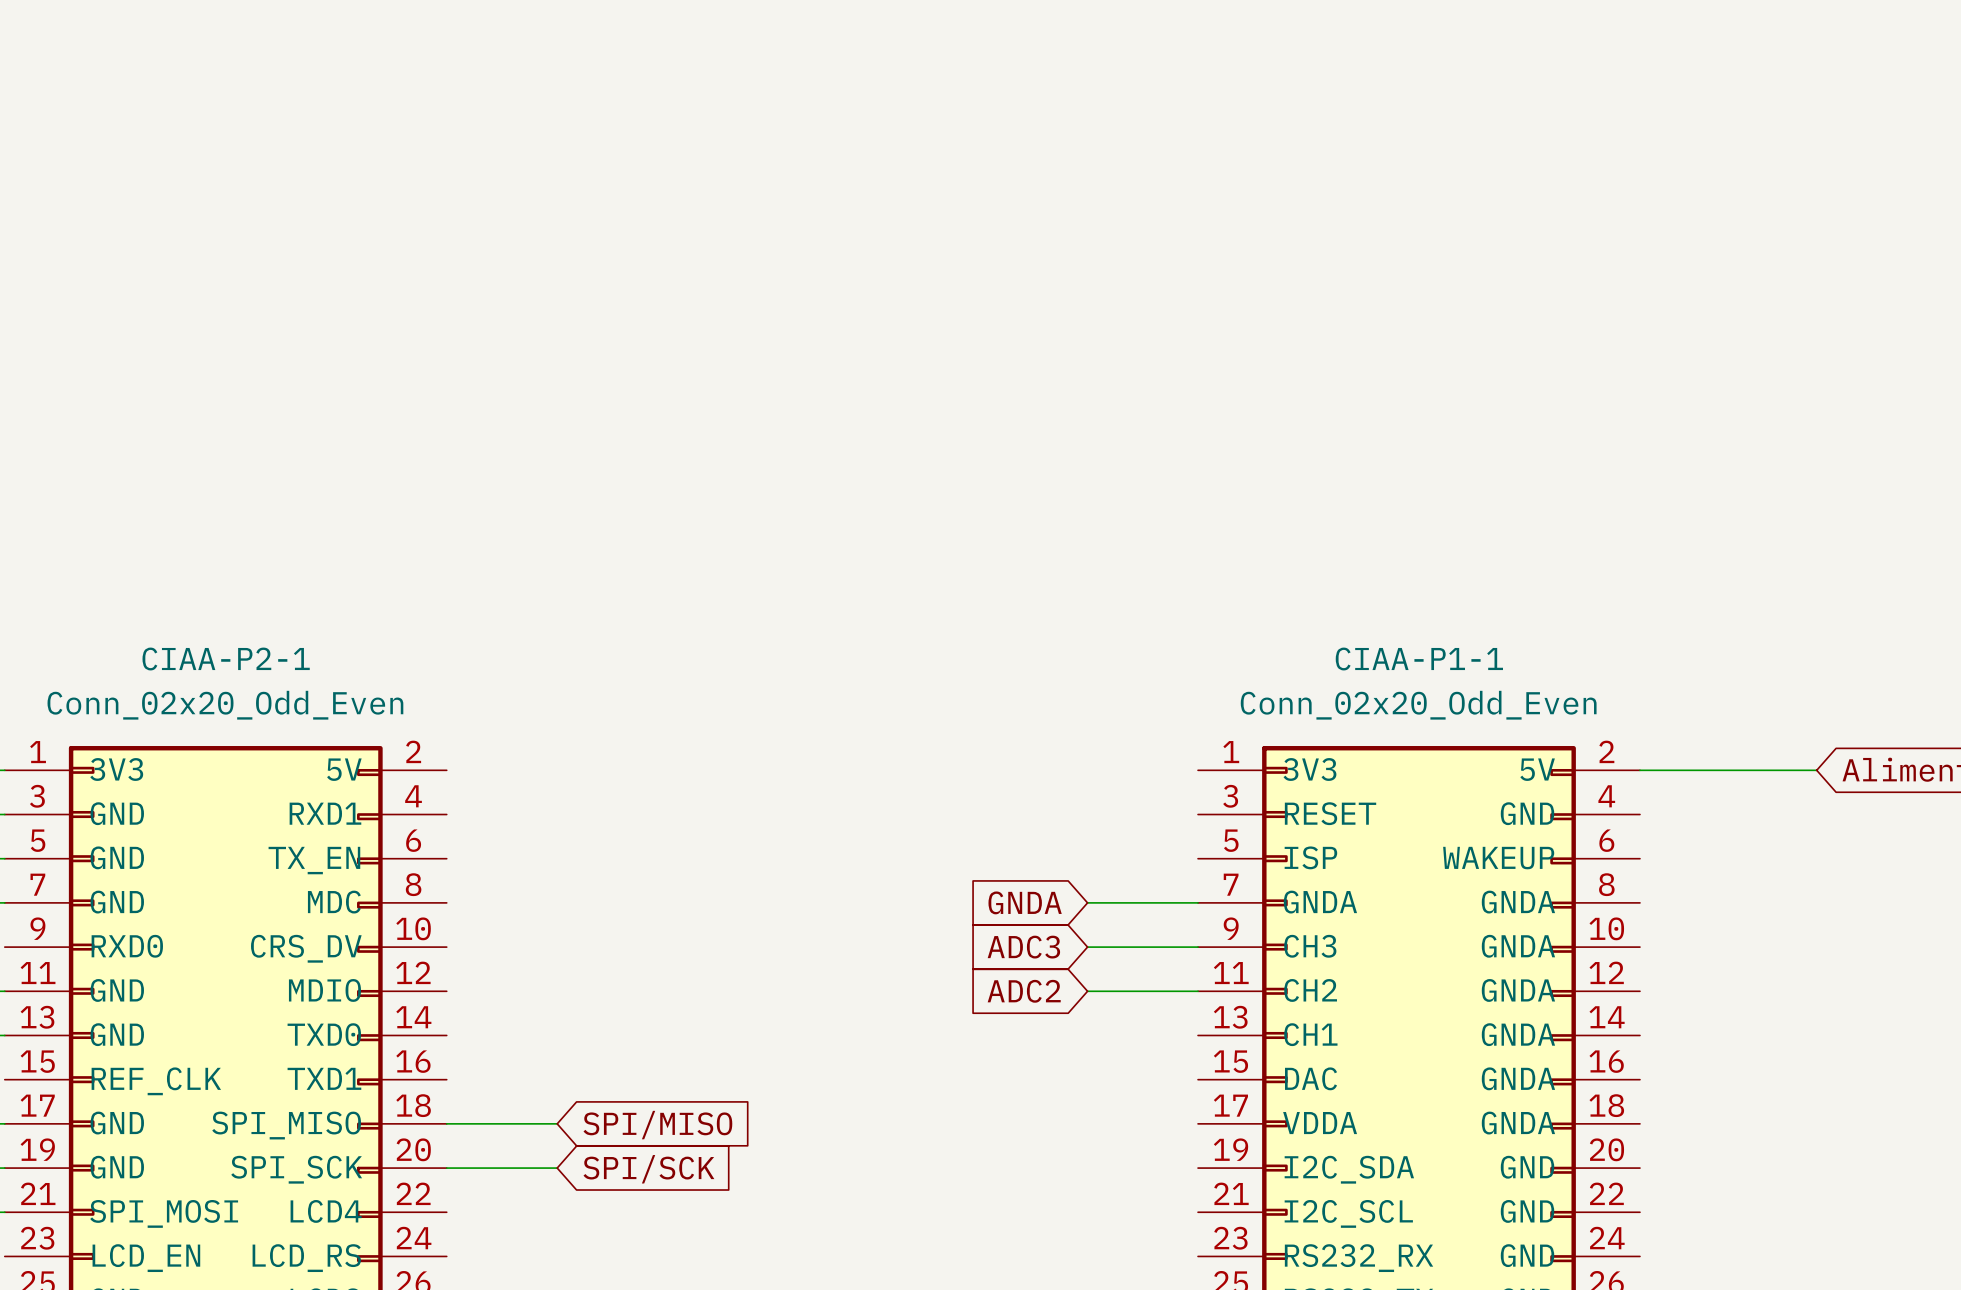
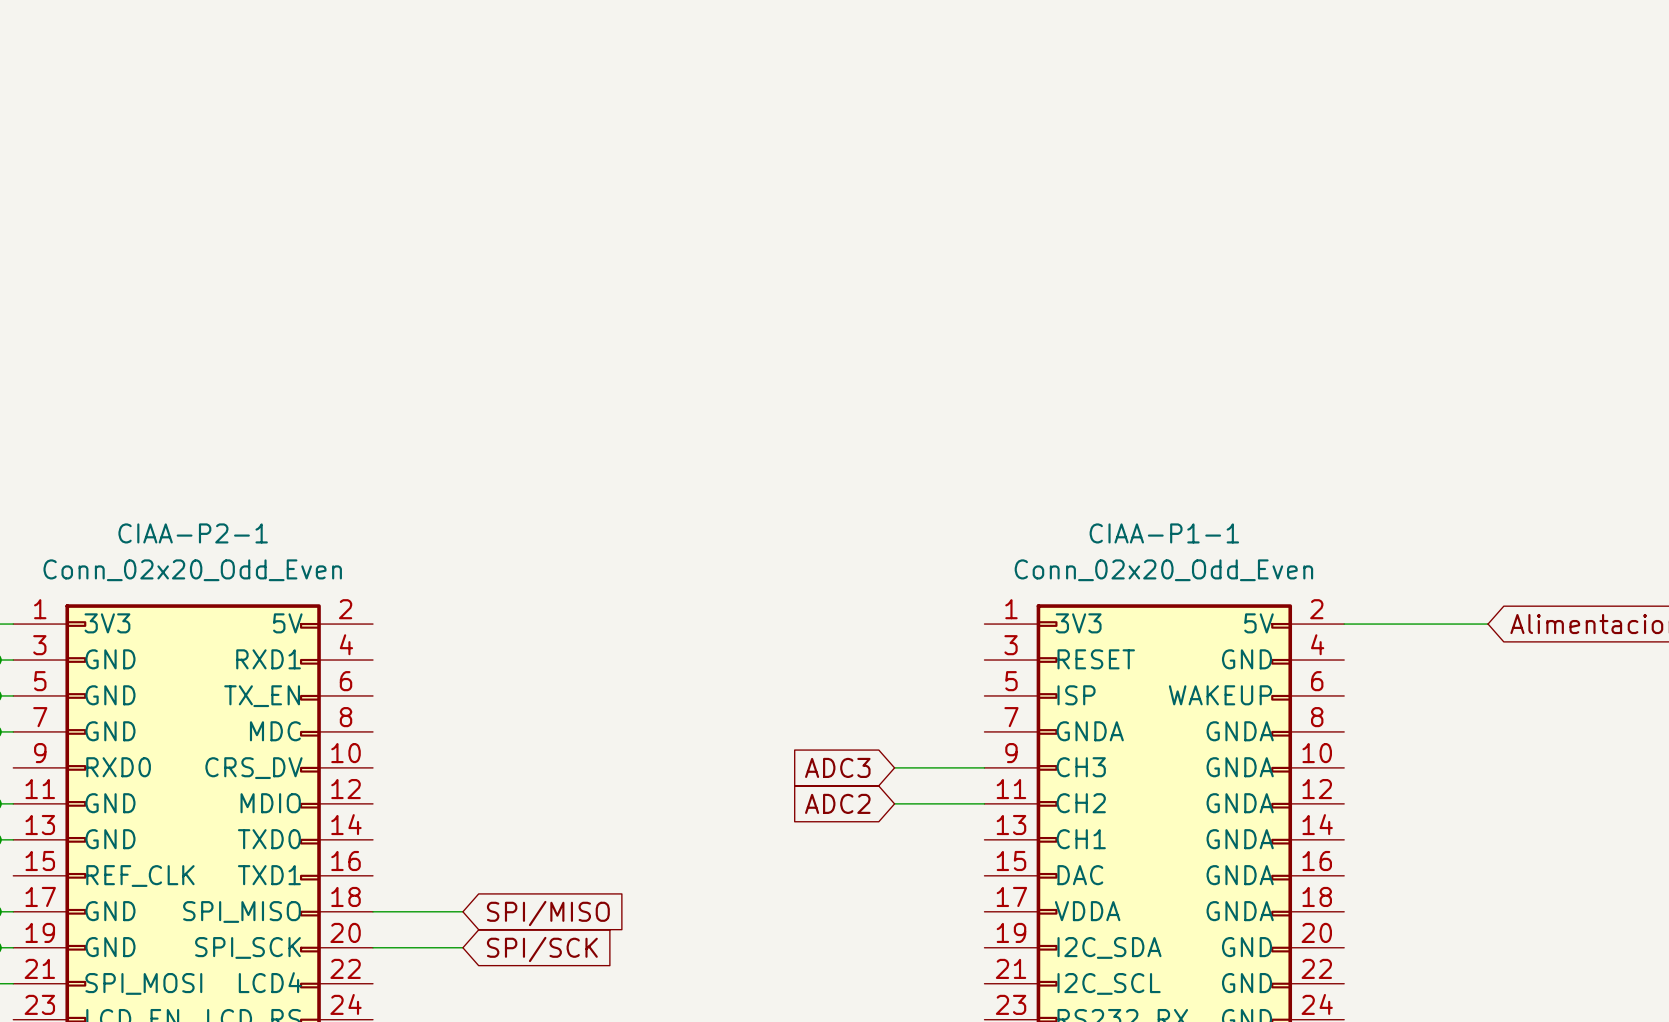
global label: GNDA (1025, 902) -> none
wire: (1087, 902) (1198, 902) -> none

